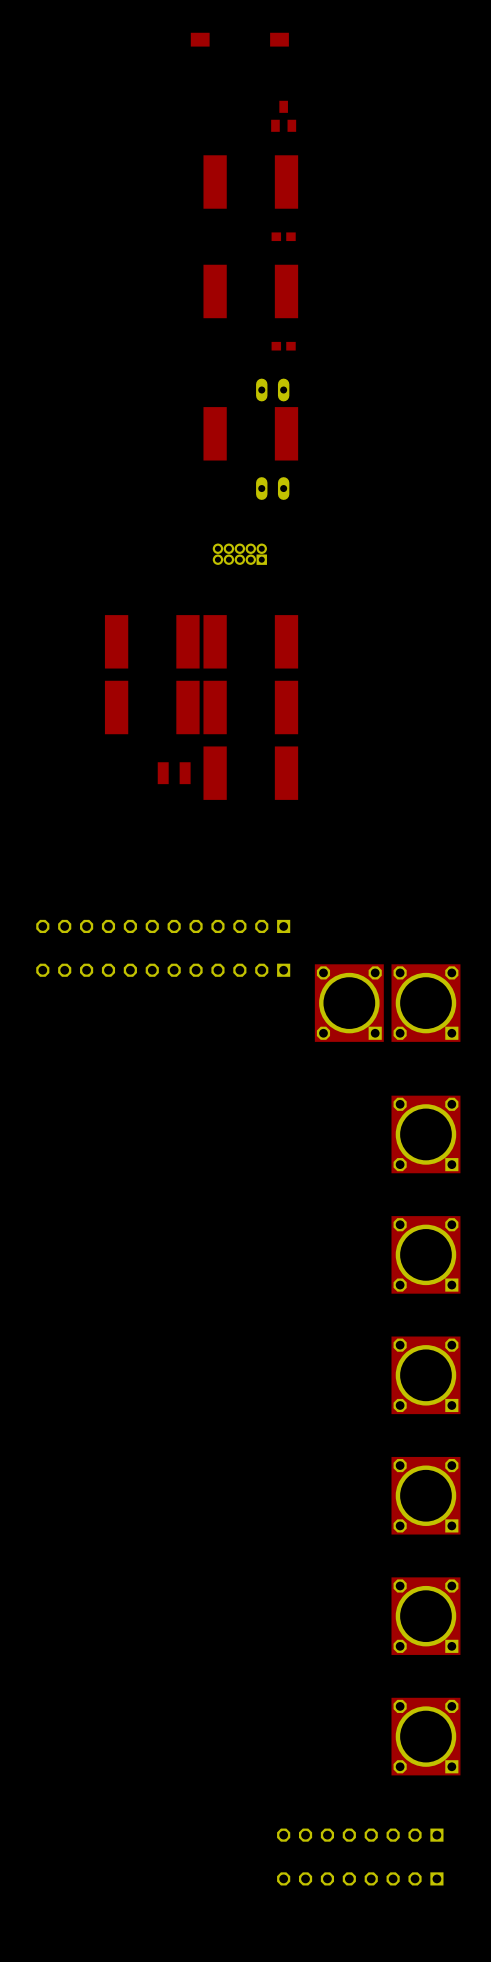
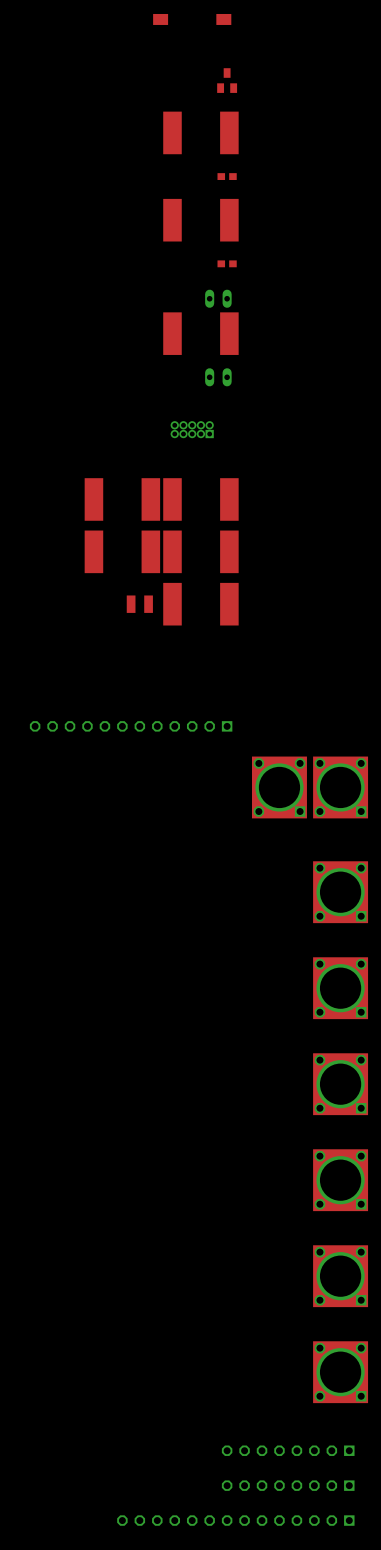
part: (163, 970) -> none
part: none -> (235, 1520)

